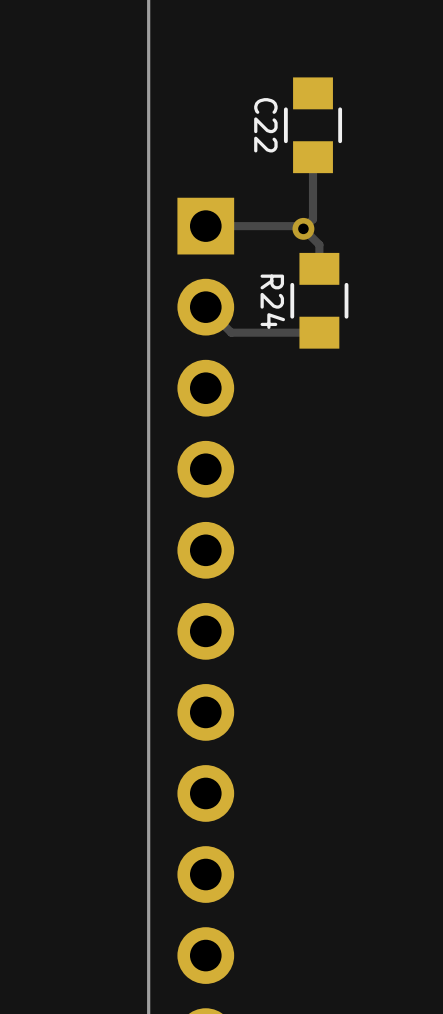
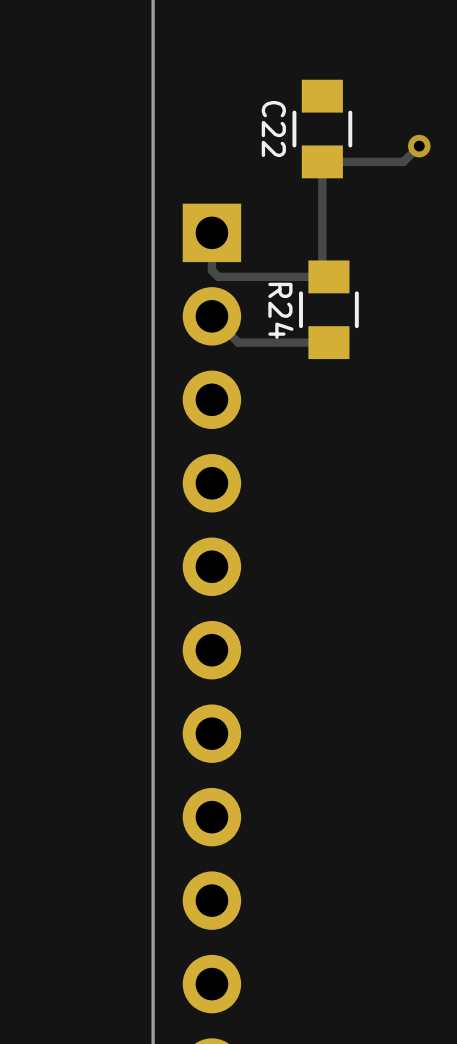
track: none -> (419, 146) (403, 161) (322, 161)
track: (205, 226) (300, 226) (319, 244) (319, 268) -> (211, 232) (211, 270) (218, 276) (328, 276) (322, 270) (322, 225)
via position: (303, 228) -> (419, 146)

